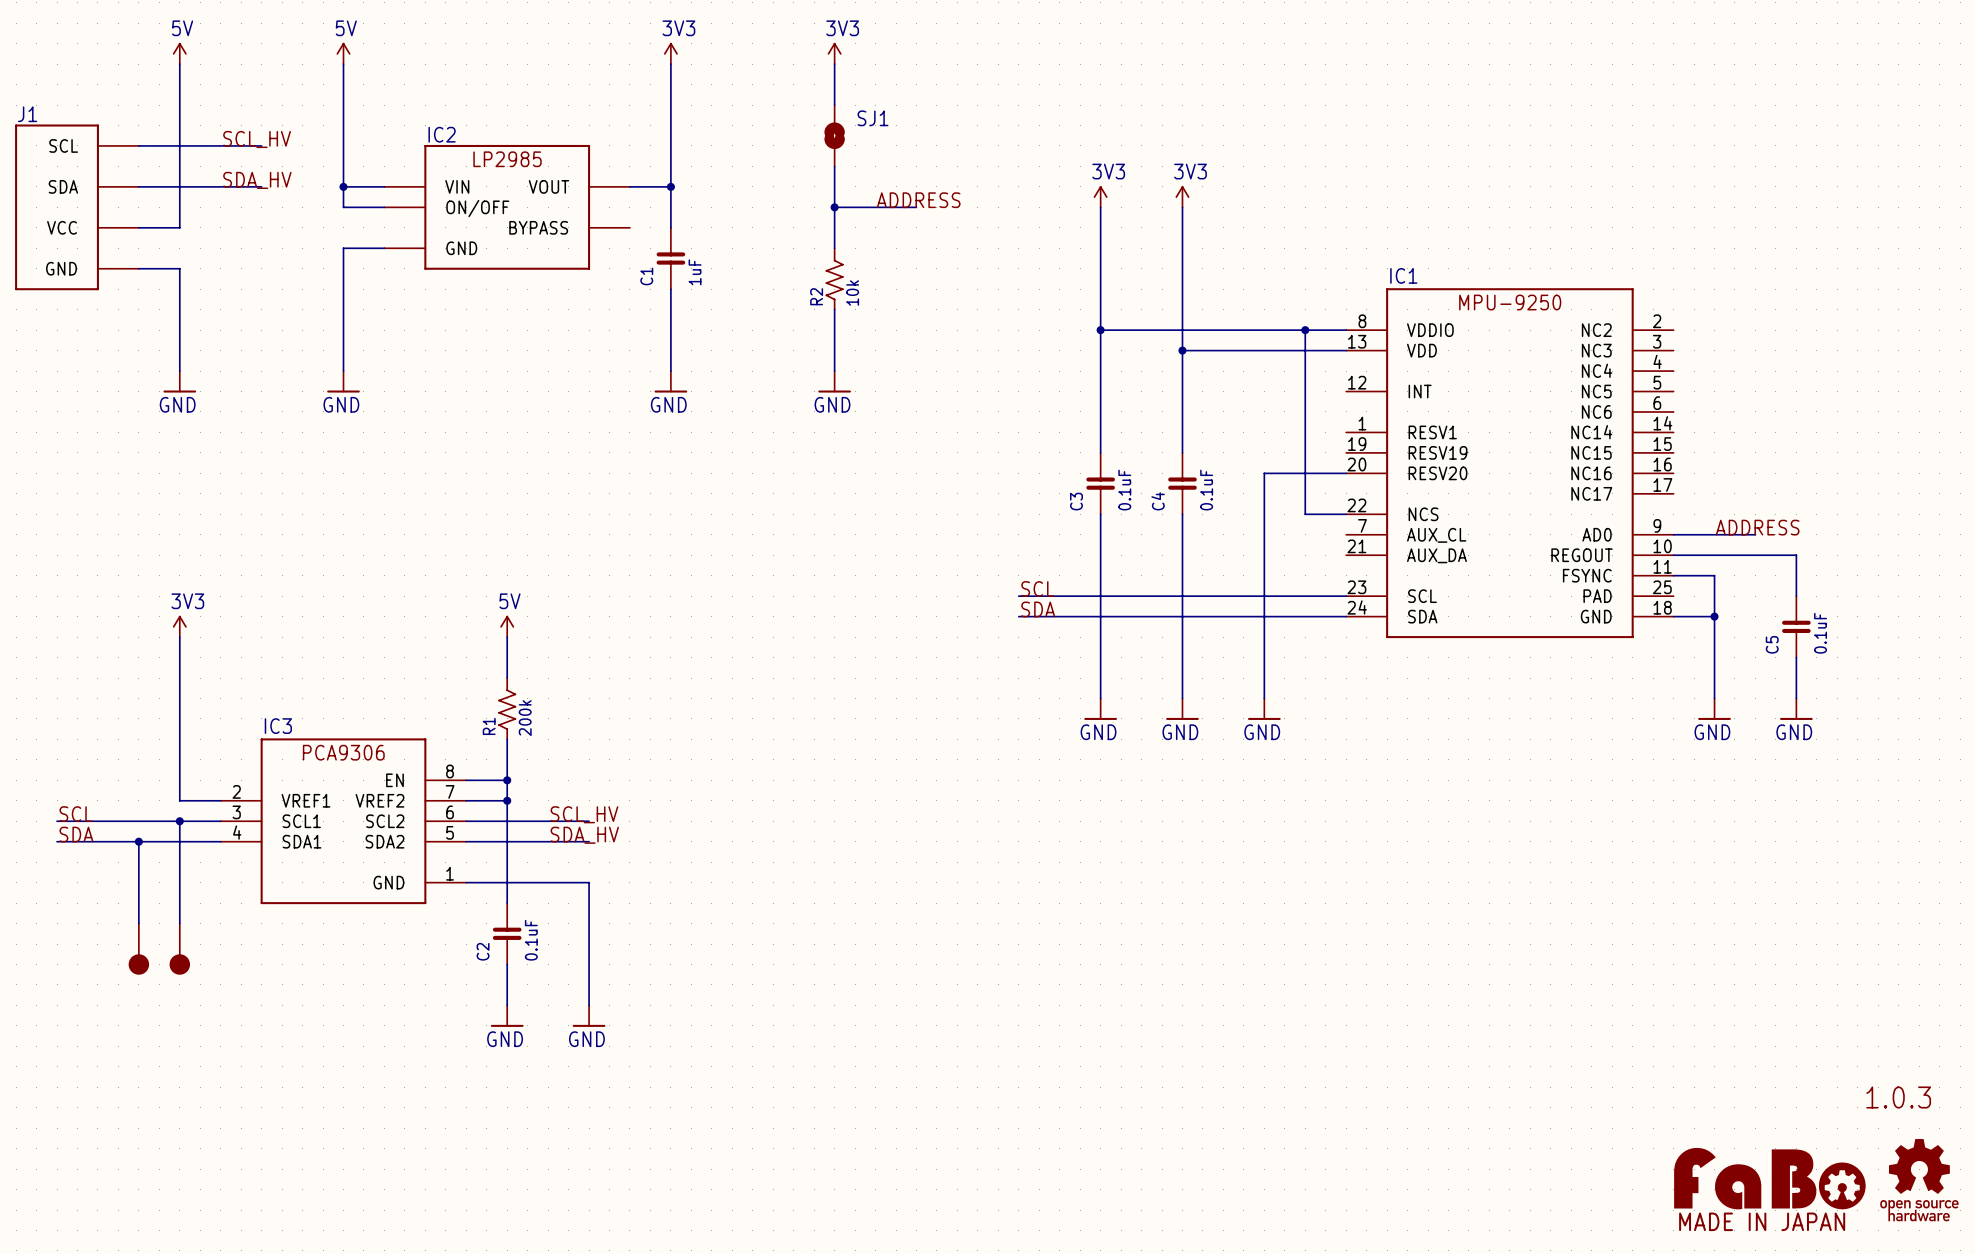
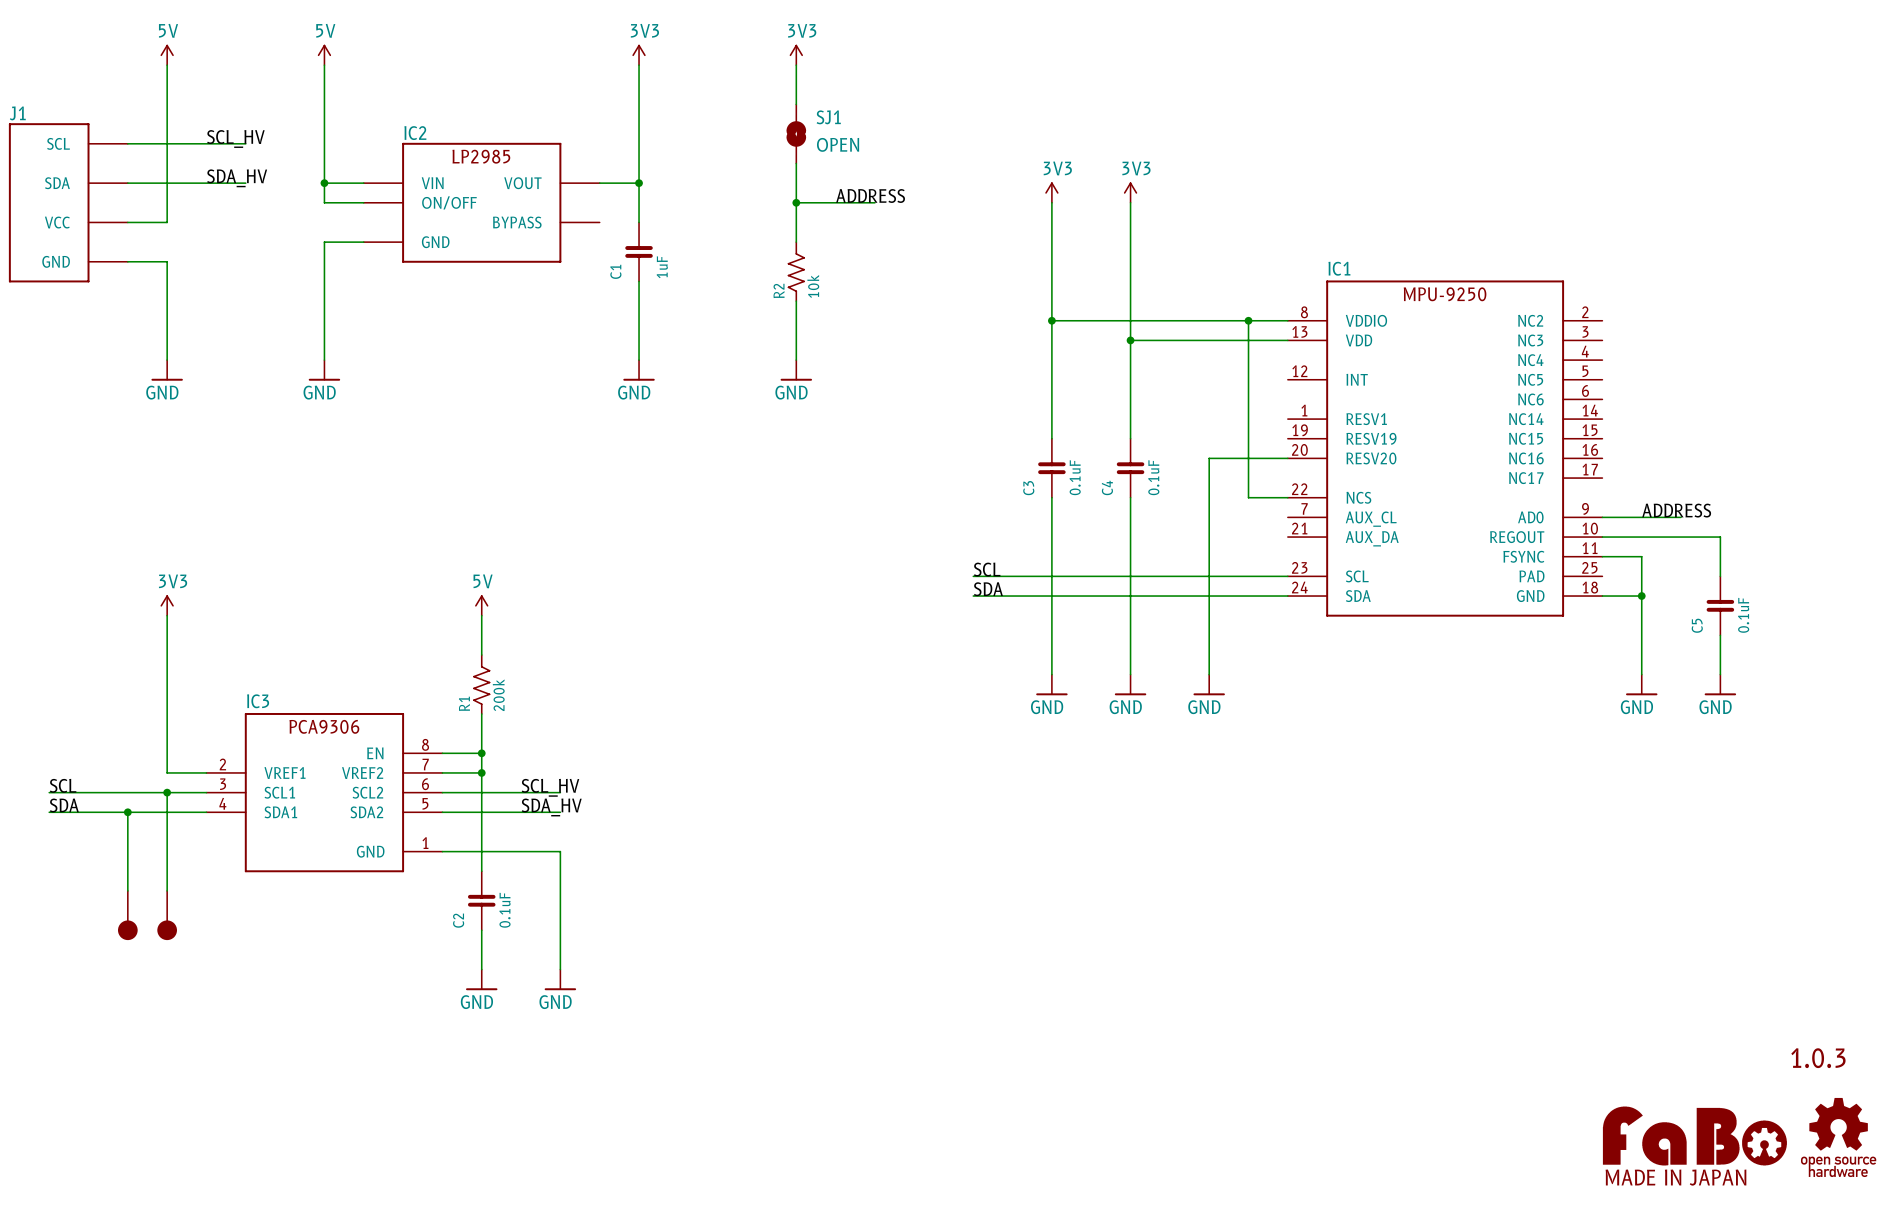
SJ1 value: none -> OPEN (838, 144)

